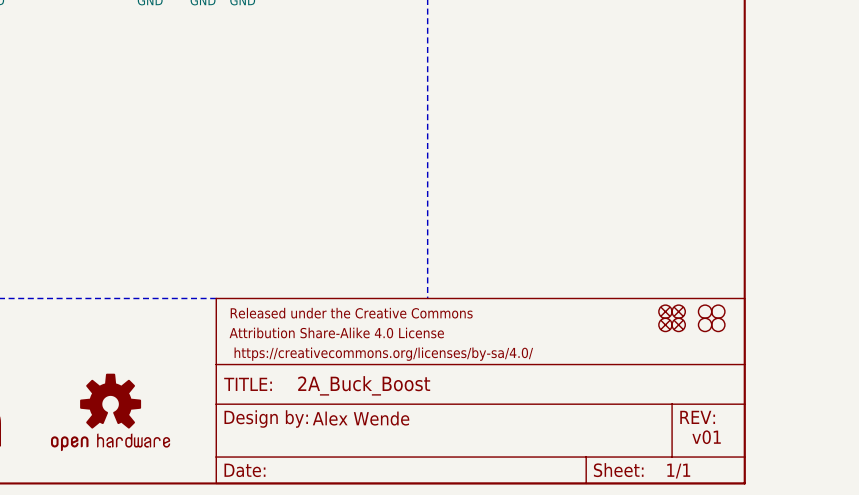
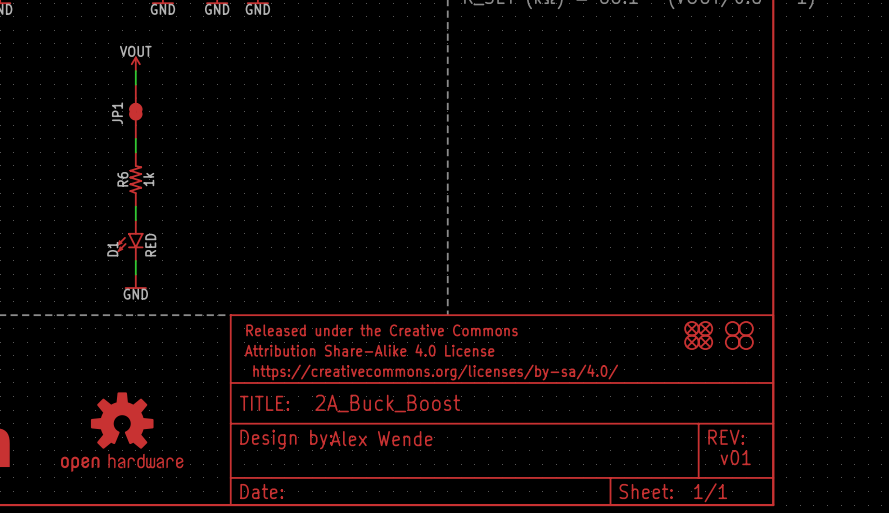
power symbol: none -> VOUT (135, 63)
wire: none -> (135, 71) (135, 84)
JP1: none -> (135, 111)
wire: none -> (135, 138) (135, 152)
R6: none -> 1k (135, 179)
wire: none -> (135, 206) (135, 220)
D1: none -> RED (130, 240)
wire: none -> (135, 260) (135, 274)
power symbol: none -> GND (135, 281)

